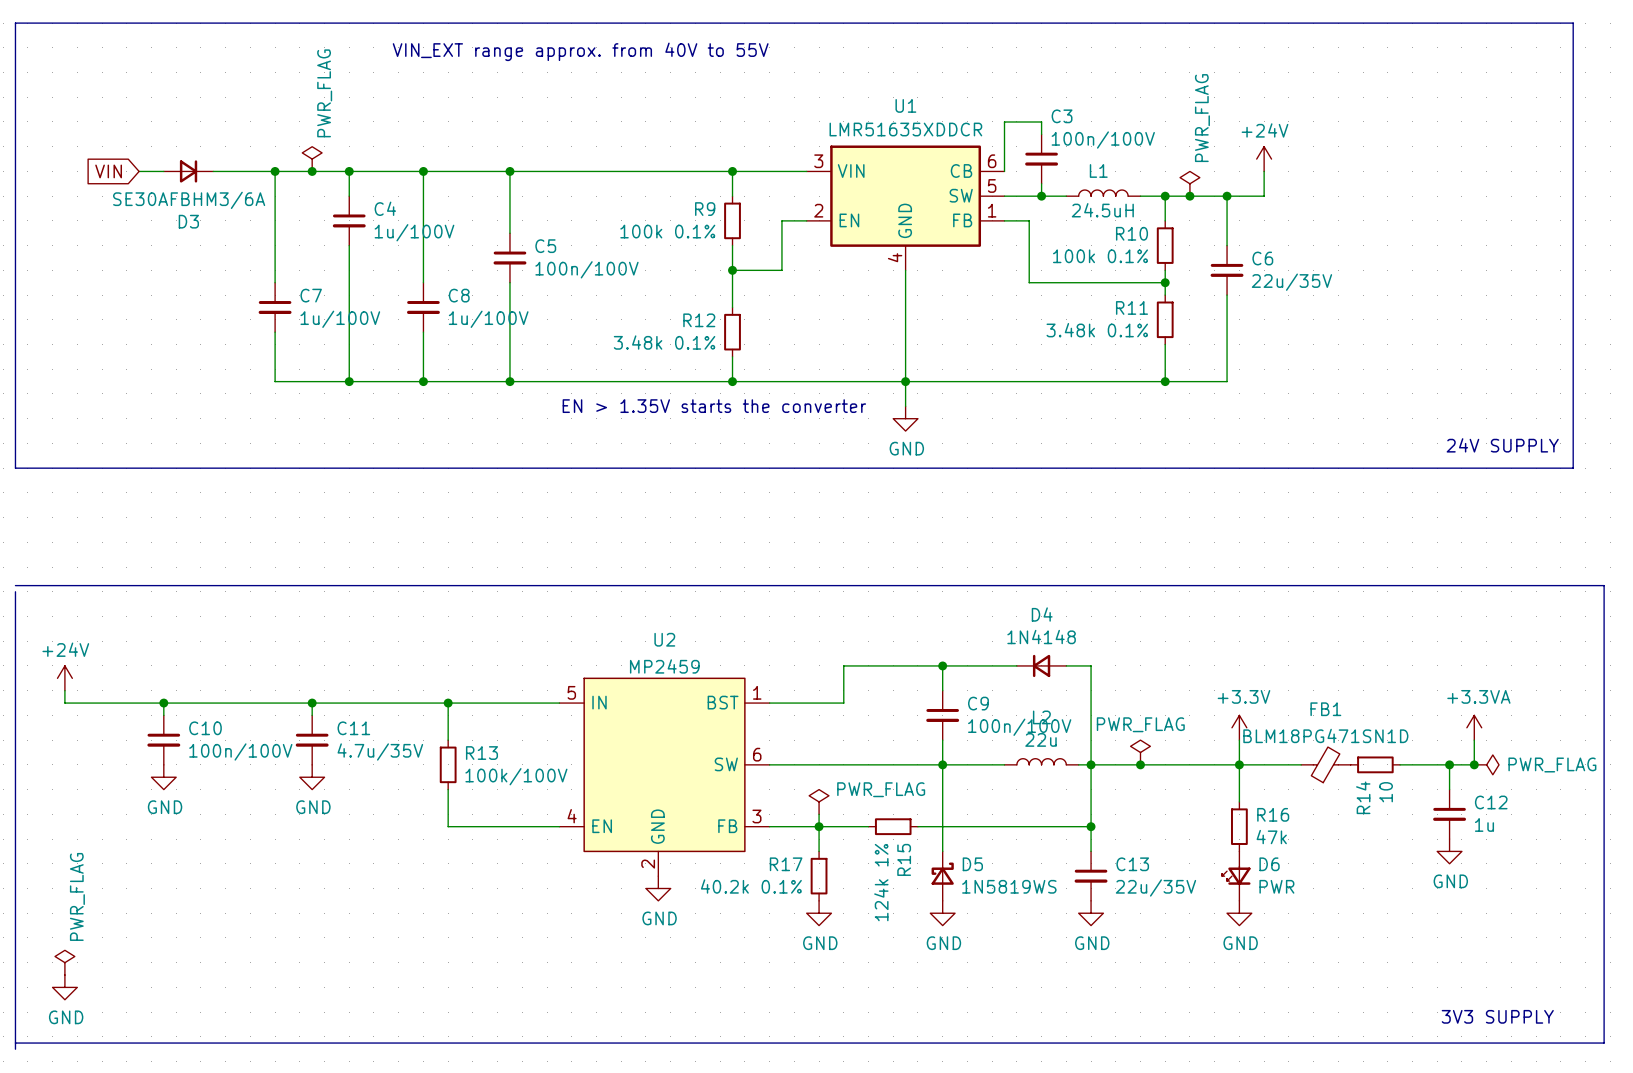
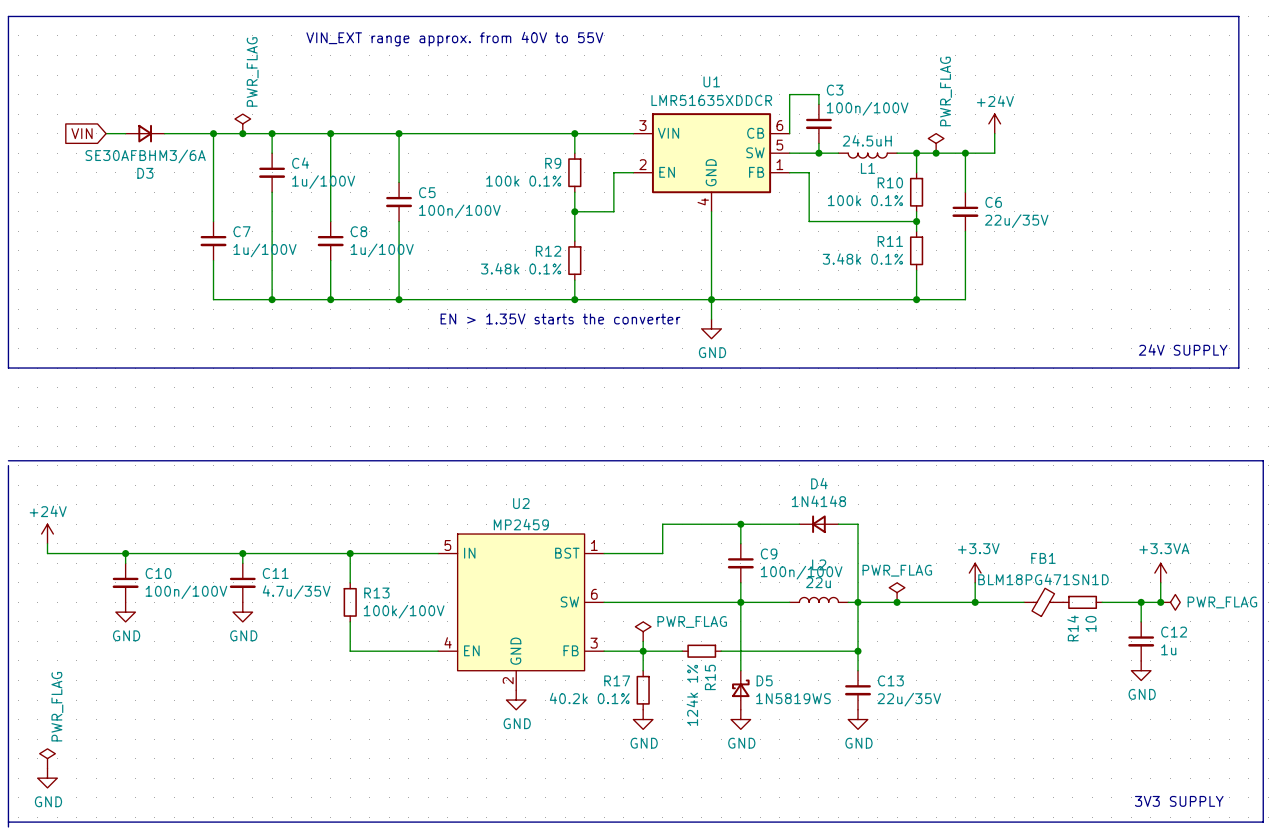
L1 rotation: 0° (1103, 193) -> 180° (867, 155)
wire: (1239, 764) (1239, 801) -> none
R16: 47k (1239, 826) -> none
D6: PWR (1236, 876) -> none
power symbol: GND (1239, 913) -> none

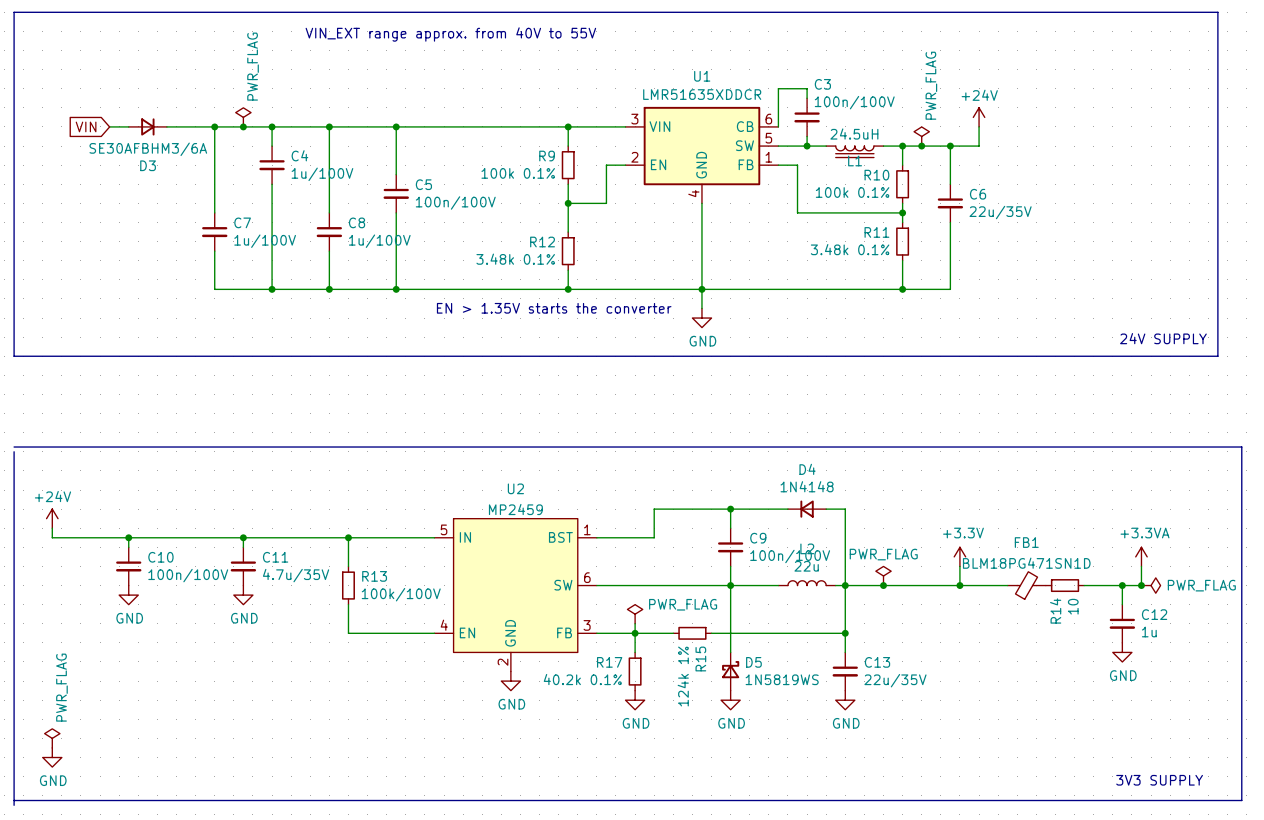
L1 symbol: [838, 153, 898, 159] -> [826, 146, 884, 158]

